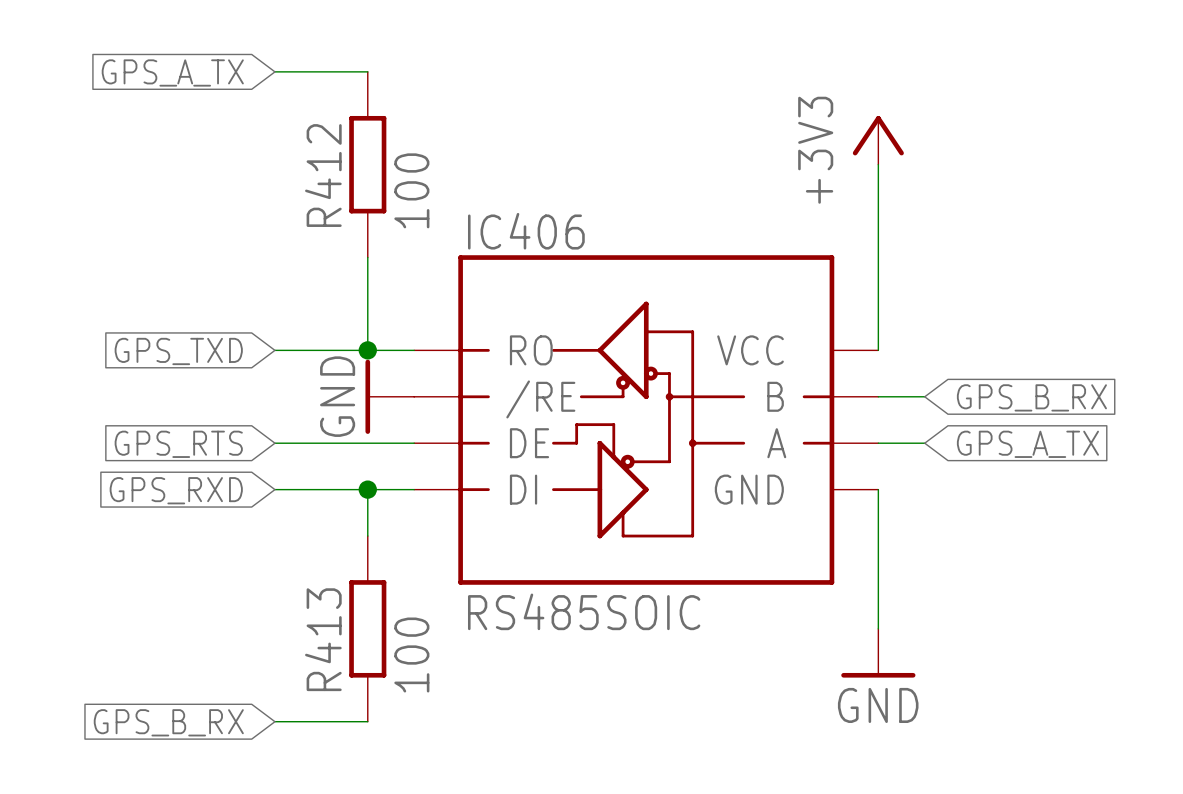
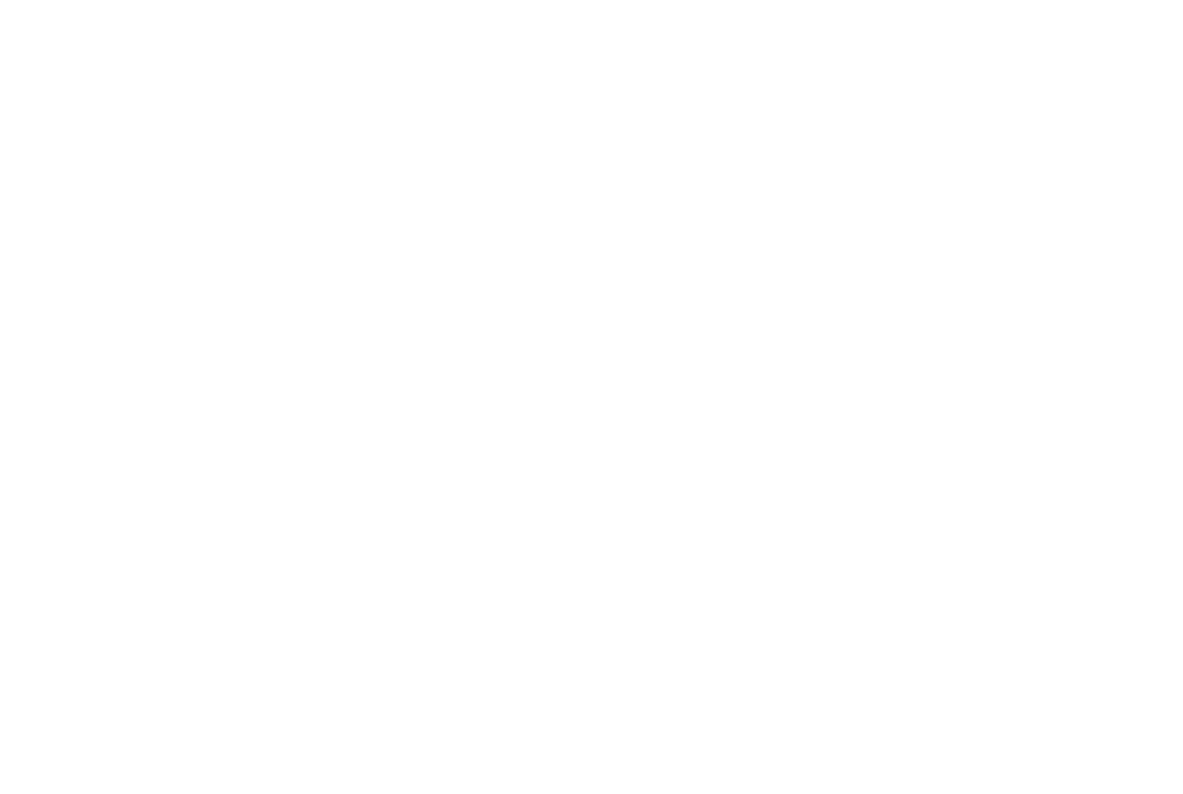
wire: (274, 71) (367, 71) -> none
global label: GPS_A_TX (172, 72) -> none
power symbol: +3V3 (878, 140) -> none
R412: 100 (367, 164) -> none
wire: (878, 164) (878, 350) -> none
wire: (367, 257) (367, 350) -> none
wire: (274, 350) (414, 350) -> none
junction: (367, 350) -> none
global label: GPS_TXD (178, 351) -> none
power symbol: GND (389, 396) -> none
wire: (878, 396) (924, 396) -> none
global label: GPS_B_RX (1031, 397) -> none
IC406: RS485SOIC (646, 420) -> none
wire: (274, 443) (414, 443) -> none
wire: (878, 443) (924, 443) -> none
global label: GPS_RTS (178, 444) -> none
global label: GPS_A_TX (1027, 444) -> none
wire: (274, 489) (414, 489) -> none
wire: (367, 489) (367, 536) -> none
junction: (367, 489) -> none
wire: (878, 489) (878, 628) -> none
global label: GPS_RXD (176, 490) -> none
R413: 100 (367, 628) -> none
power symbol: GND (878, 653) -> none
wire: (274, 721) (367, 721) -> none
global label: GPS_B_RX (168, 722) -> none

